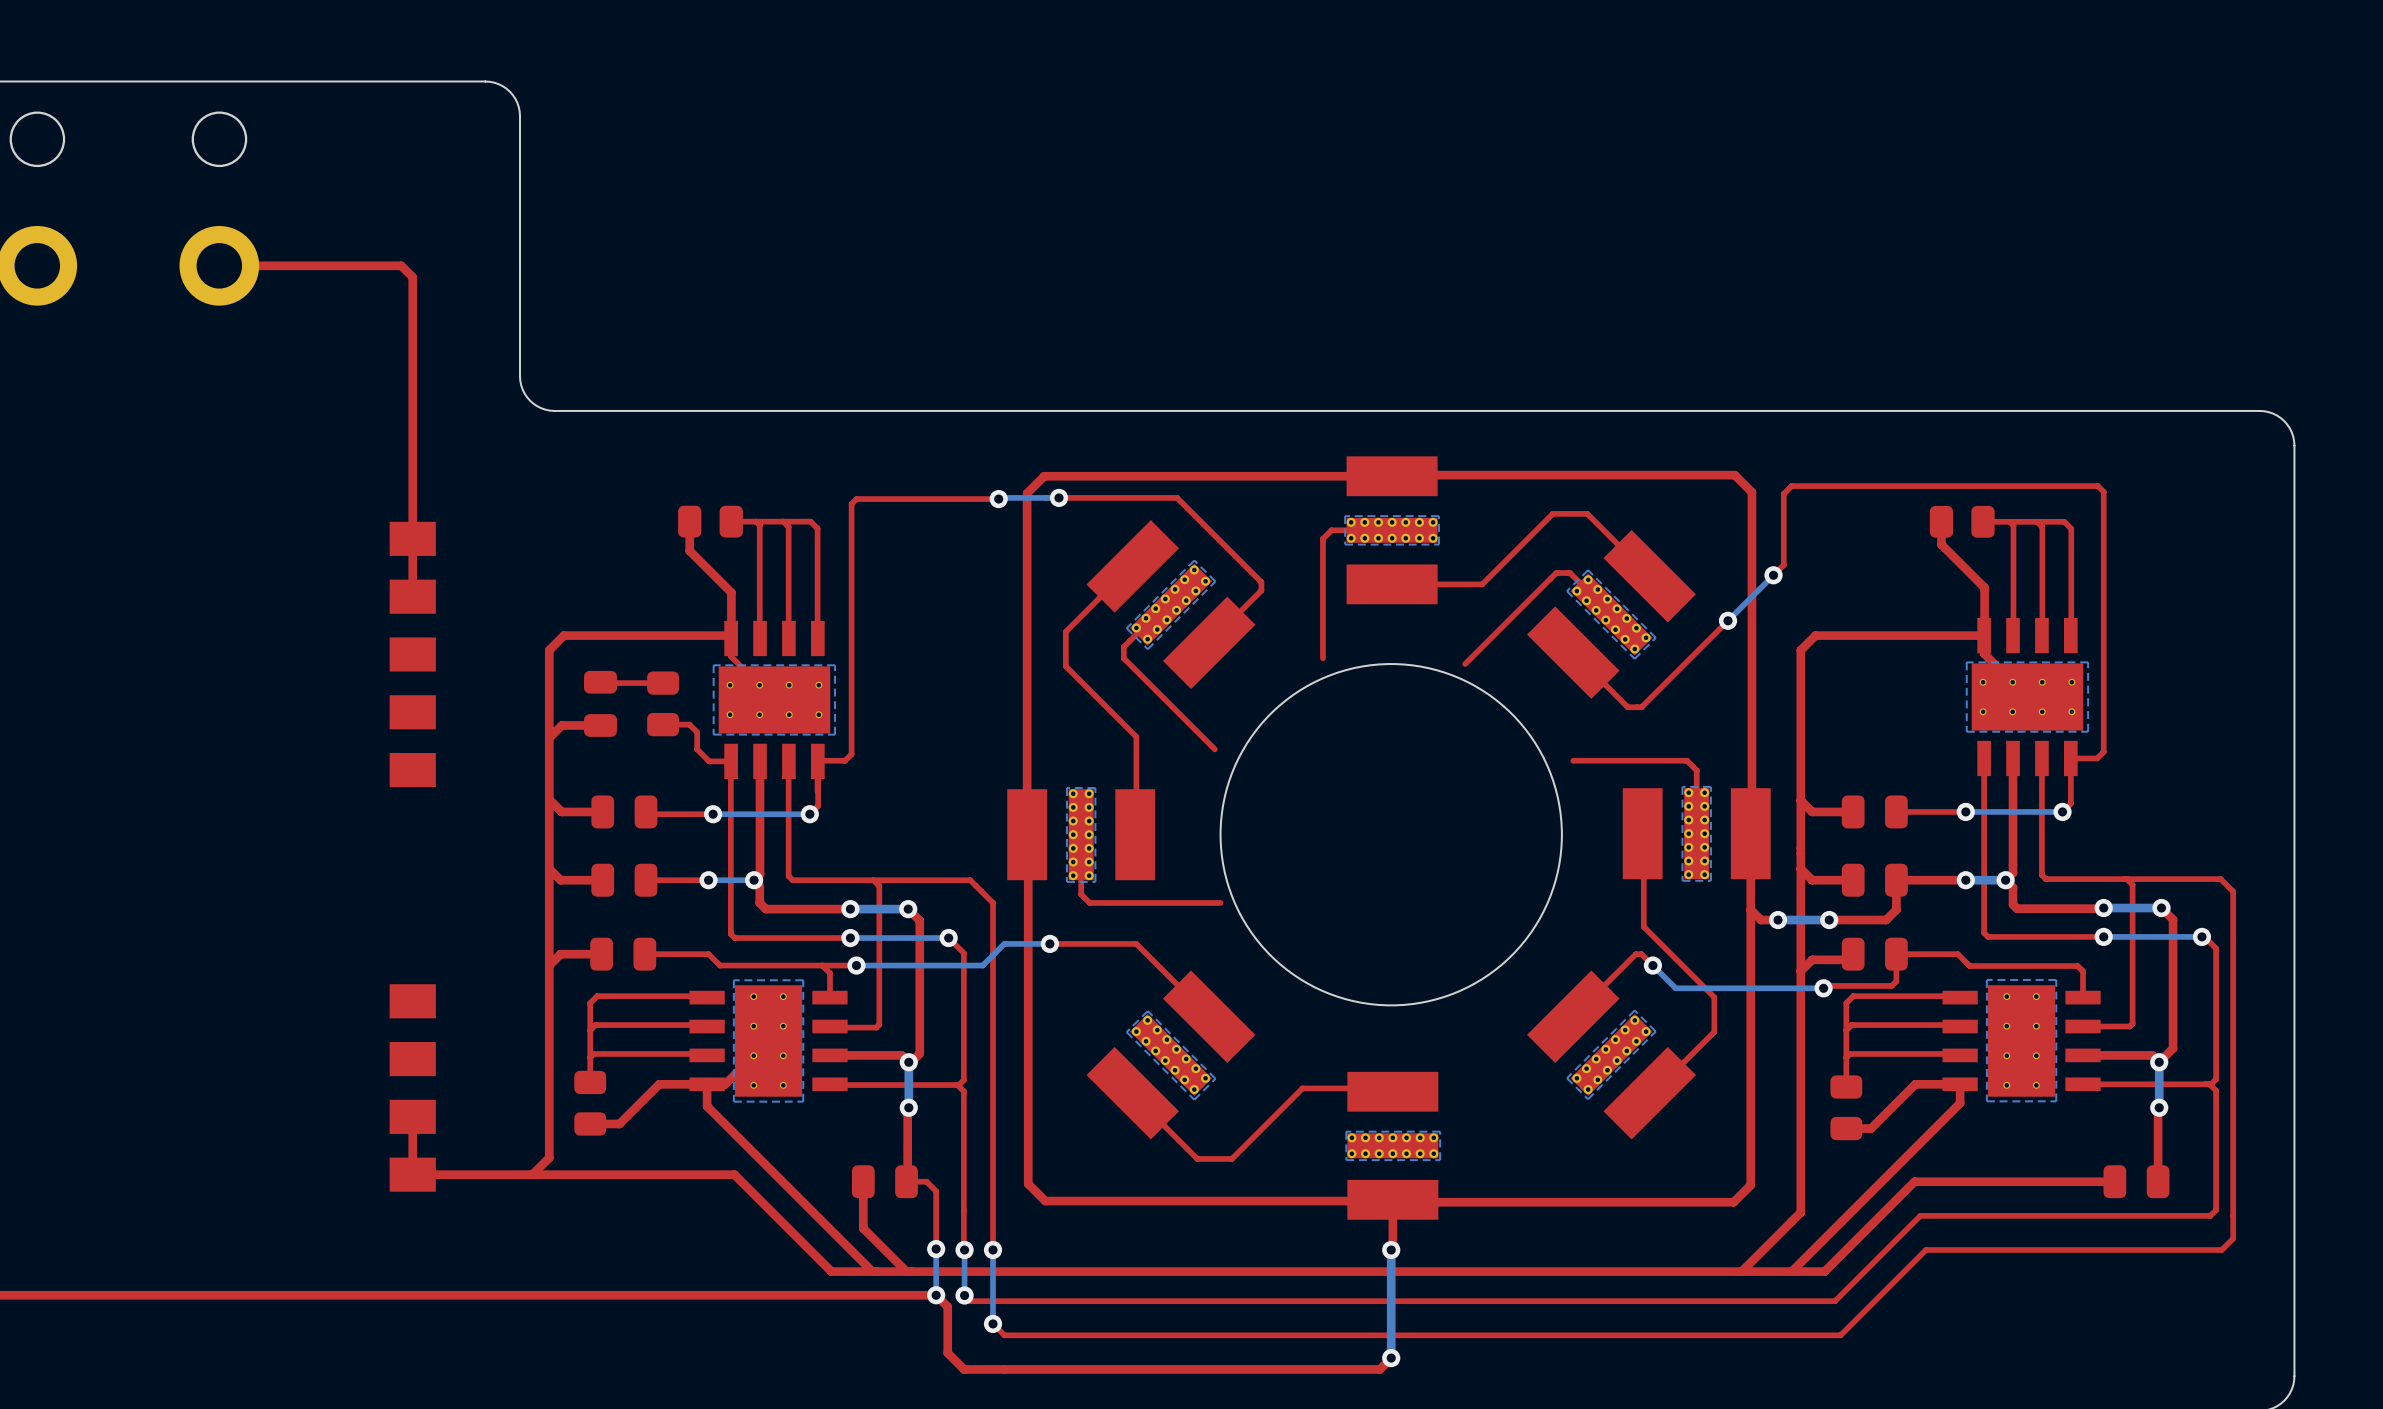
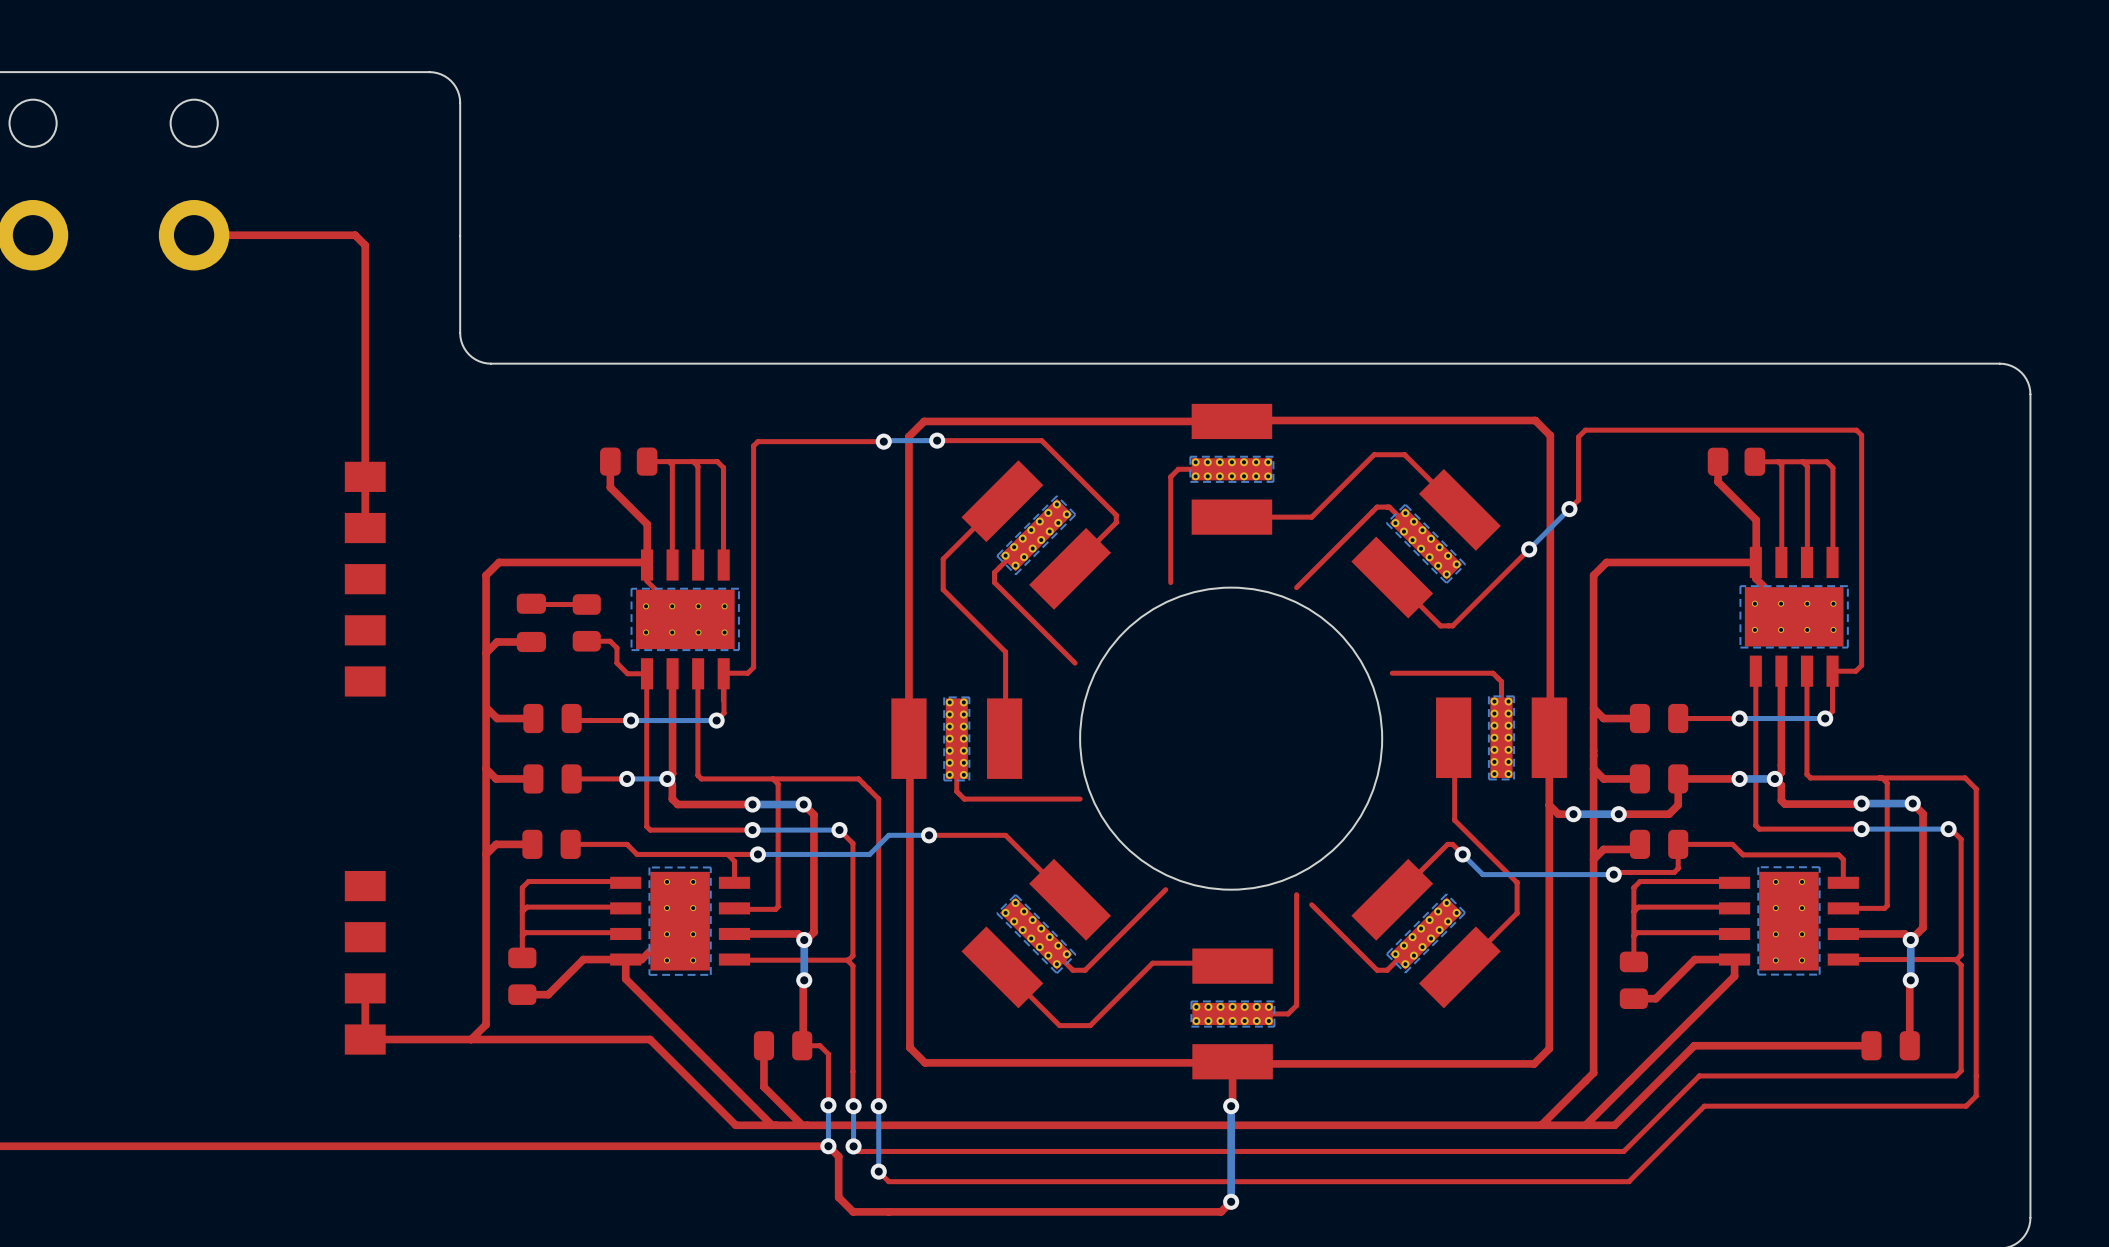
top track: none -> (1165, 889) (1085, 970) (1072, 970) (1036, 933)
top track: none -> (1296, 894) (1296, 1005) (1288, 1013) (1232, 1013)
top track: none -> (1311, 904) (1377, 970) (1387, 970) (1423, 933) (1426, 933)

